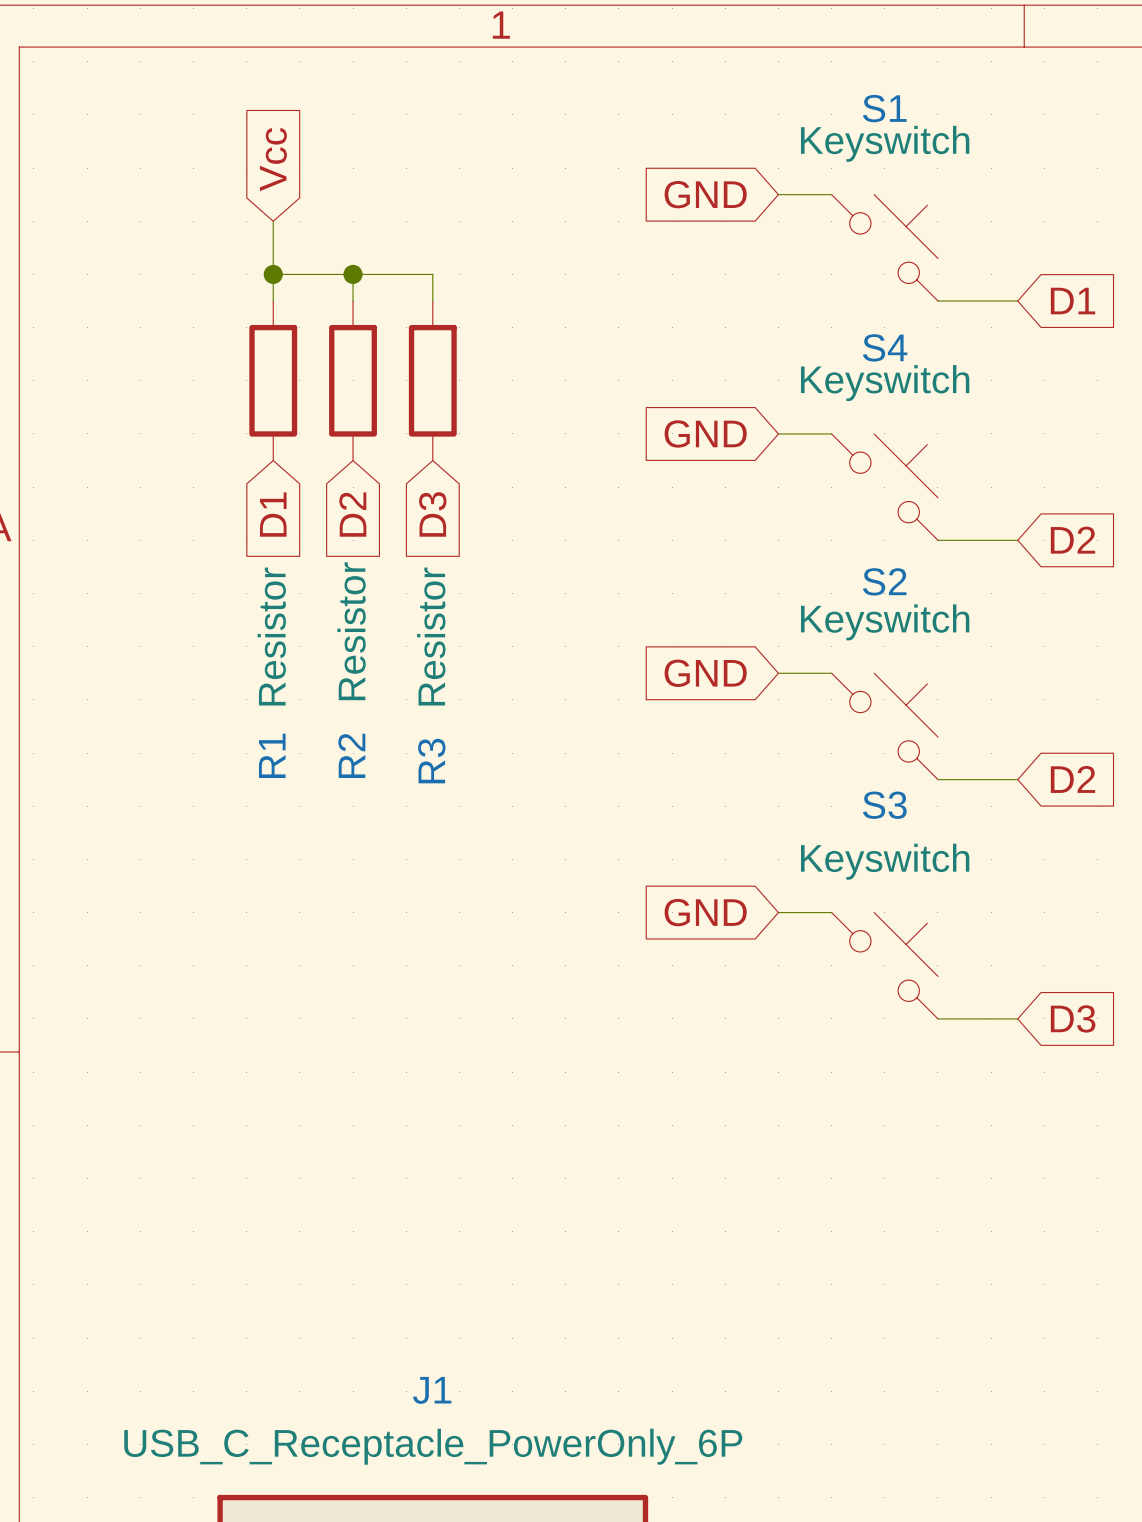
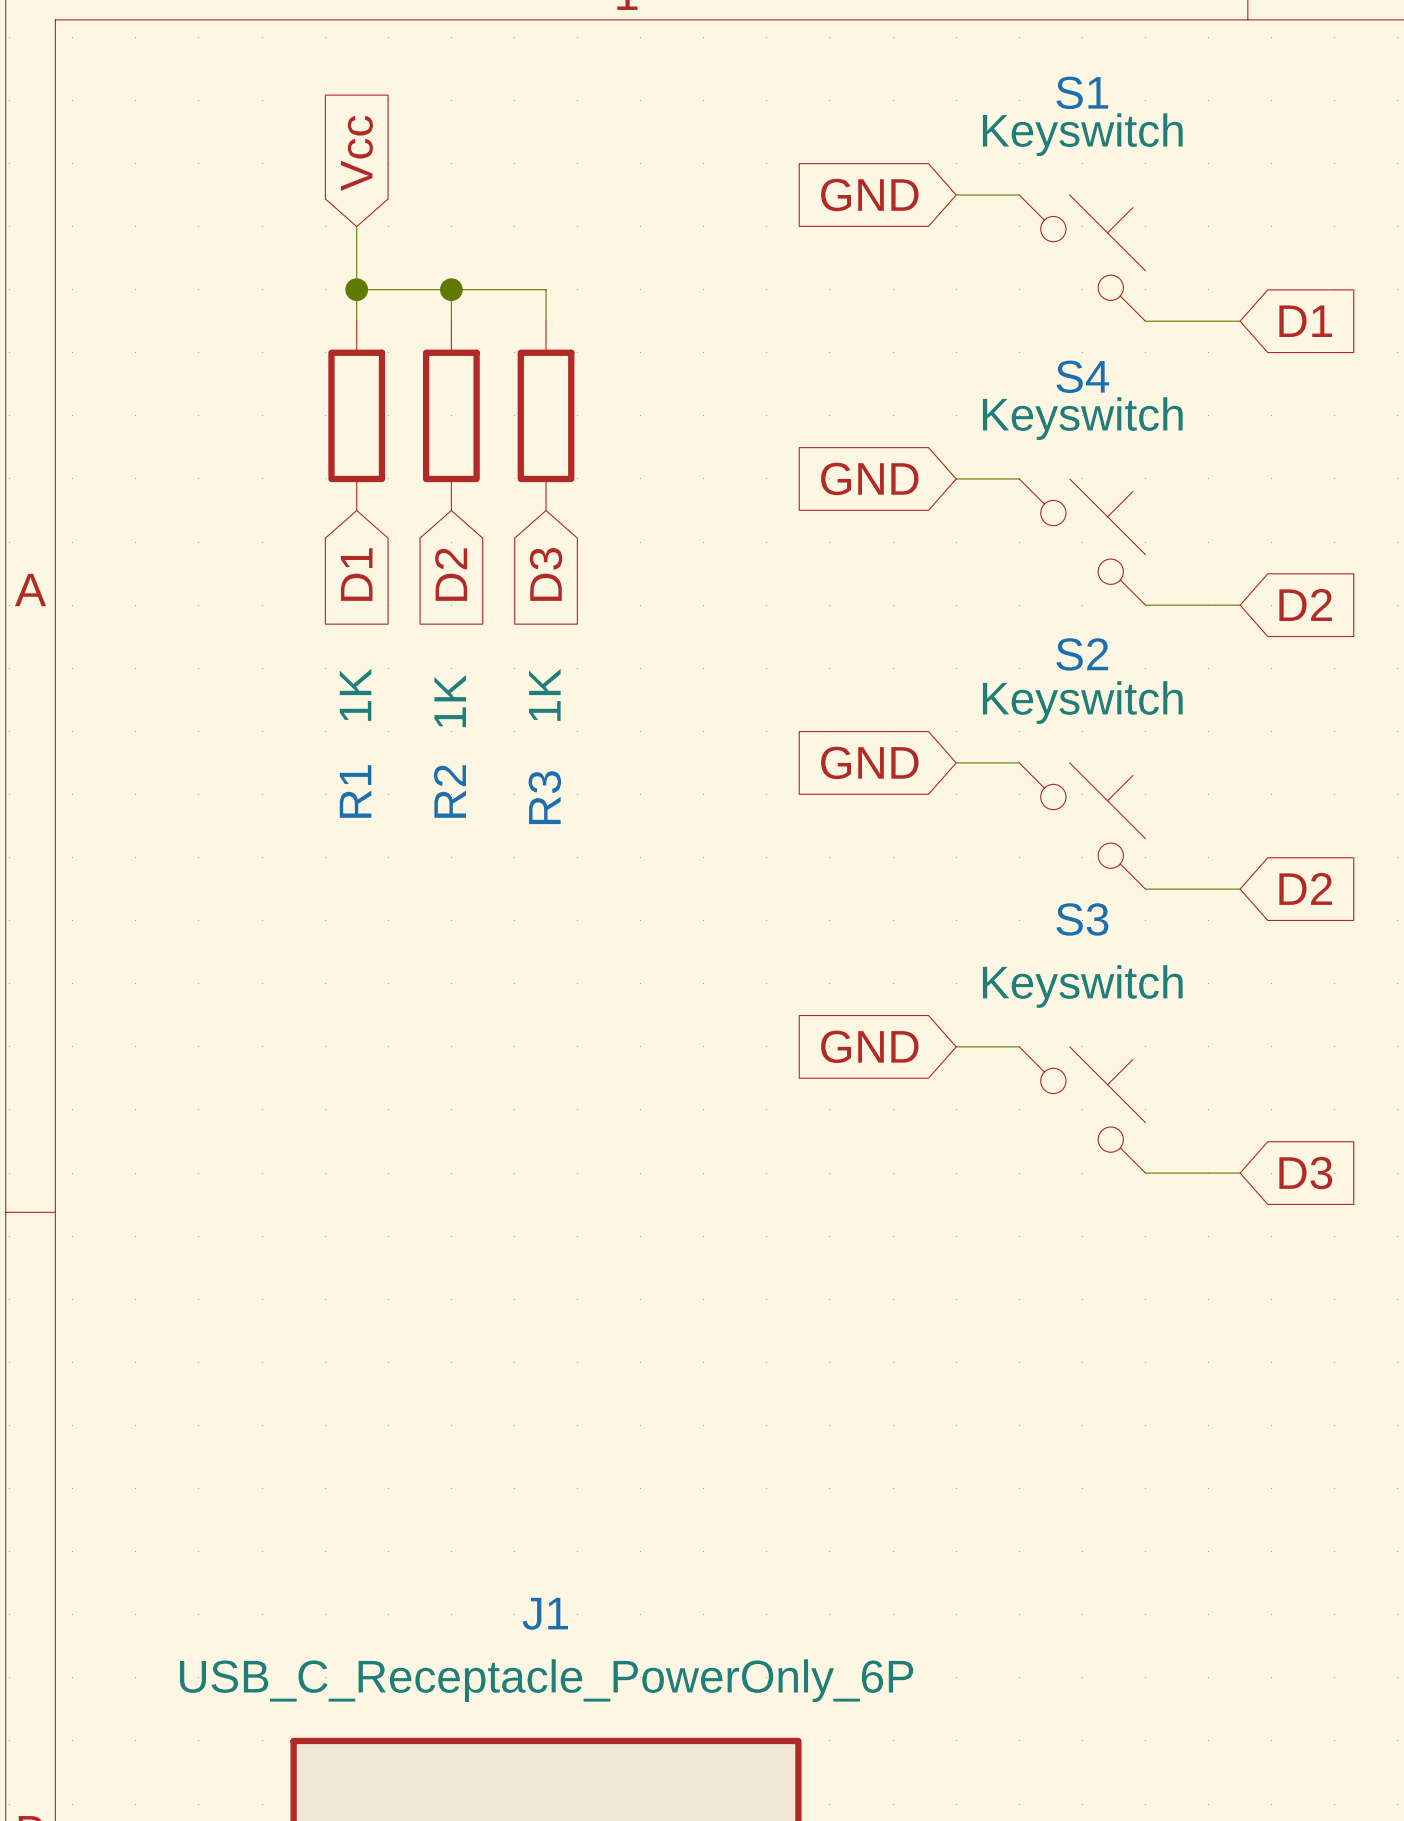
R2 value: Resistor (351, 631) -> 1K (450, 701)
R1 value: Resistor (271, 636) -> 1K (355, 694)
R3 value: Resistor (431, 636) -> 1K (544, 694)
R1 name position: R1 (272, 755) -> R1 (355, 791)
R2 name position: R2 (351, 755) -> R2 (449, 791)
R3 name position: R3 (431, 761) -> R3 (544, 797)

